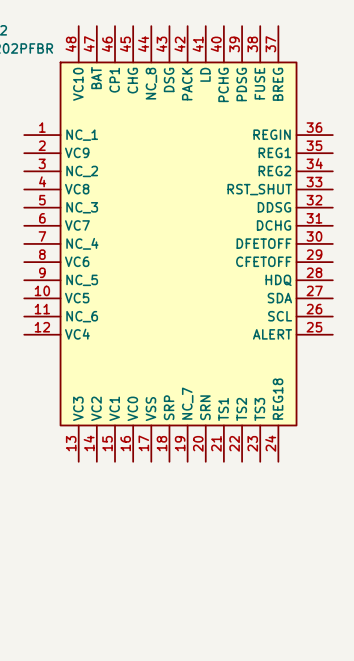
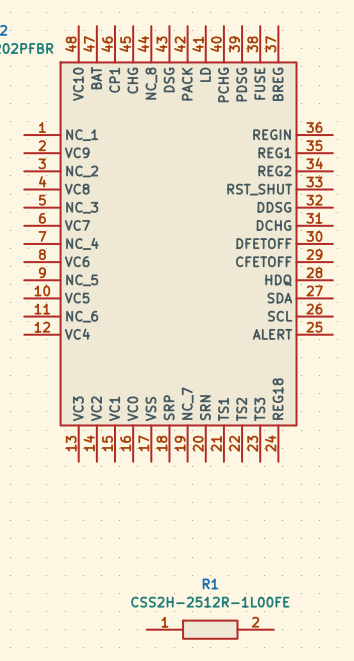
R1: none -> CSS2H-2512R-1L00FE (210, 629)

